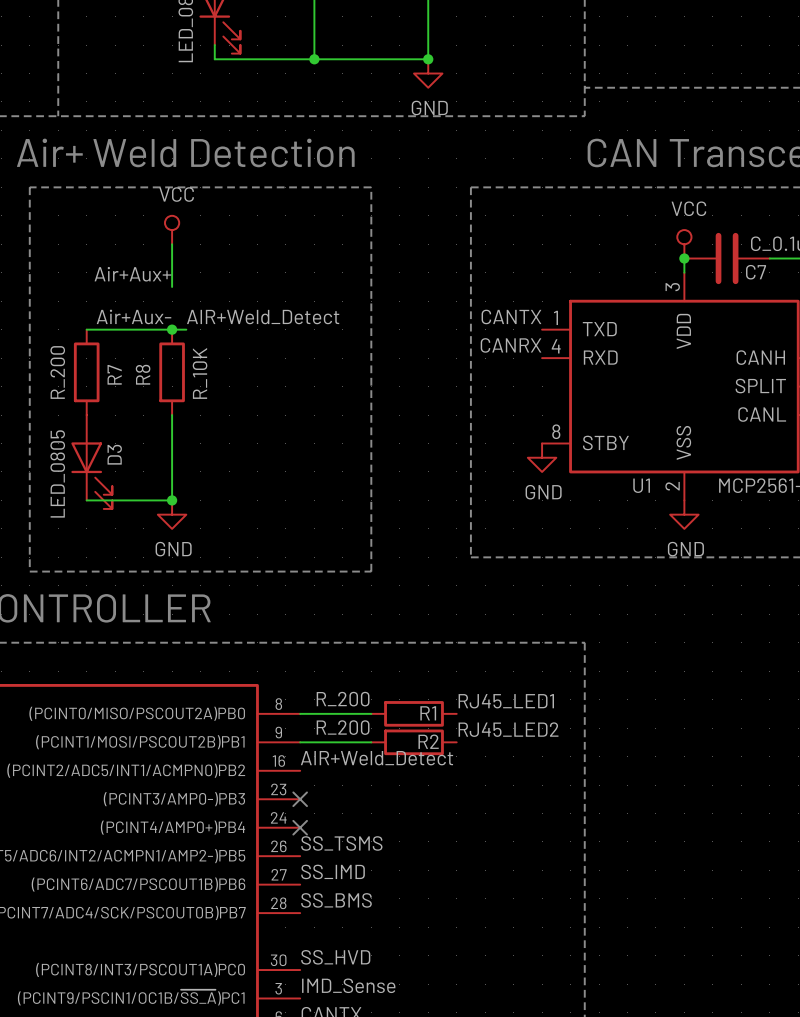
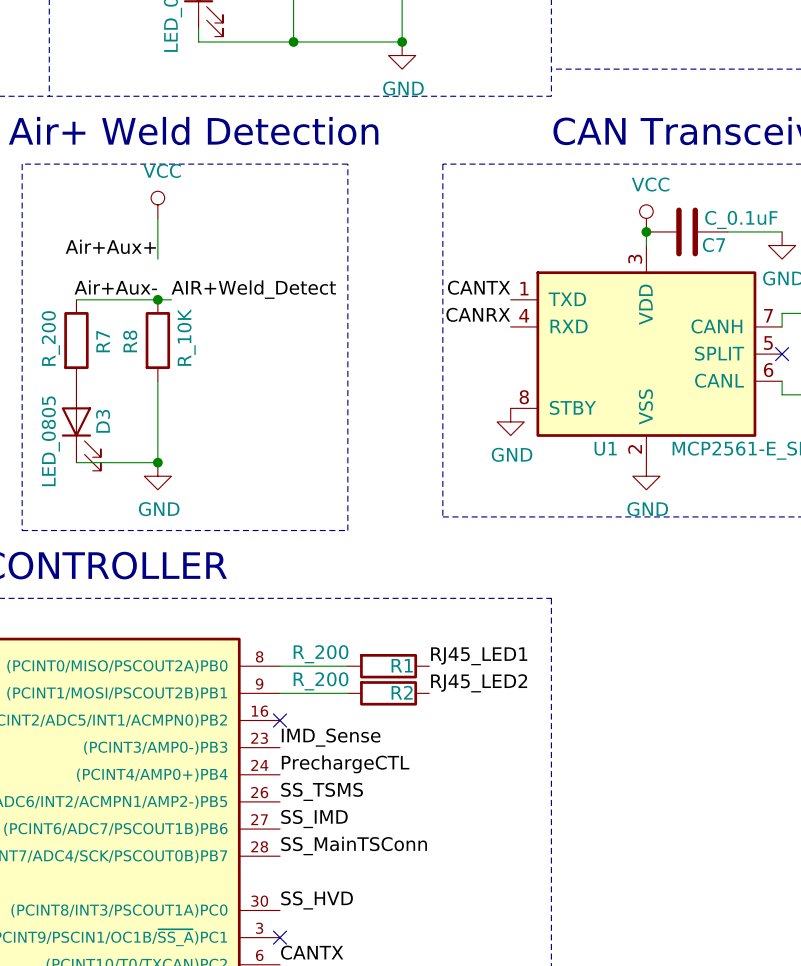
label: AIR+Weld_Detect (376, 758) -> none
no-connect mark: none -> (280, 720)
no-connect mark: (300, 799) -> none
label: none -> PrechargeCTL (345, 764)
no-connect mark: (300, 827) -> none
label: SS_BMS (336, 900) -> SS_MainTSConn (354, 845)
label position: IMD_Sense (348, 985) -> IMD_Sense (331, 737)
no-connect mark: none -> (280, 937)

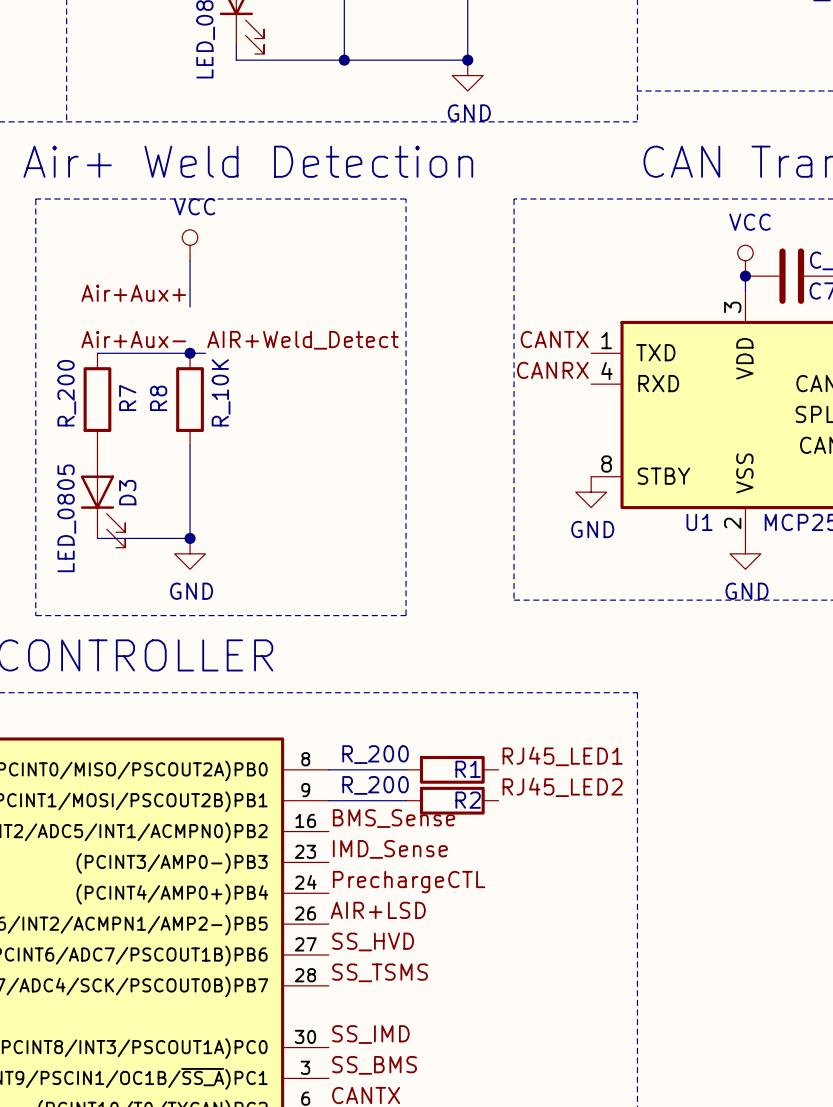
label: none -> BMS_Sense (394, 818)
no-connect mark: (280, 720) -> none
label: SS_TSMS (322, 791) -> AIR+LSD (378, 910)
label: SS_IMD (314, 819) -> SS_HVD (373, 941)
label: SS_MainTSConn (354, 845) -> SS_TSMS (380, 972)
label: SS_HVD (317, 900) -> SS_IMD (370, 1034)
label: none -> SS_BMS (374, 1065)
no-connect mark: (280, 937) -> none

